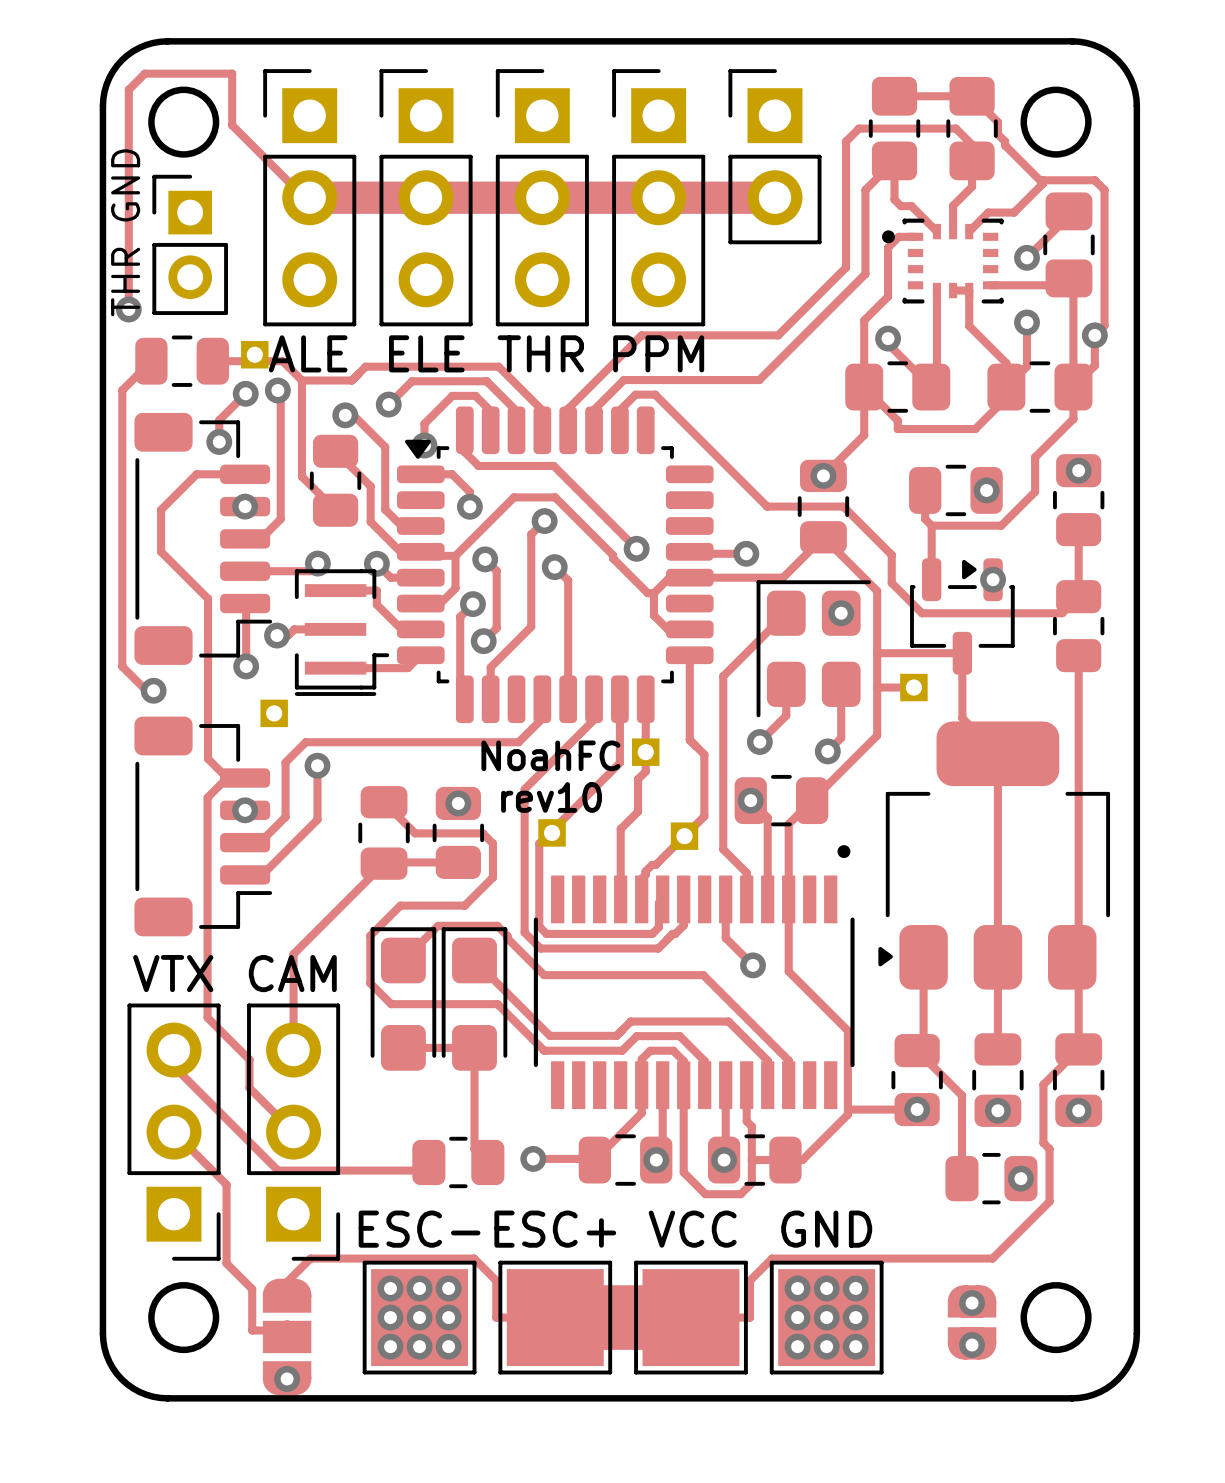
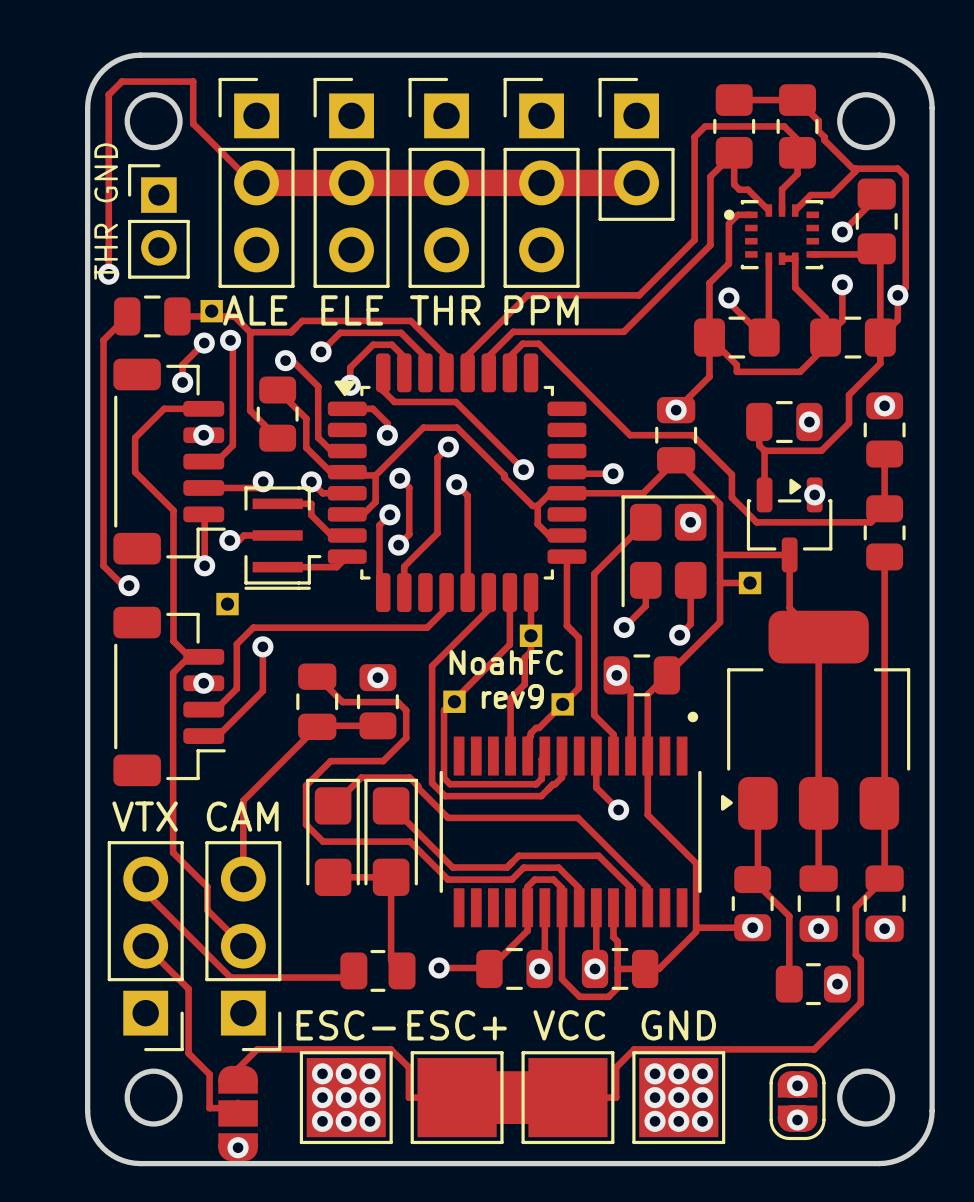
text position: NoahFC (550, 755) -> NoahFC (506, 662)
text: rev10 (551, 797) -> rev9 (512, 696)
part footprint: [947, 1285, 997, 1360] -> [769, 1063, 826, 1141]

